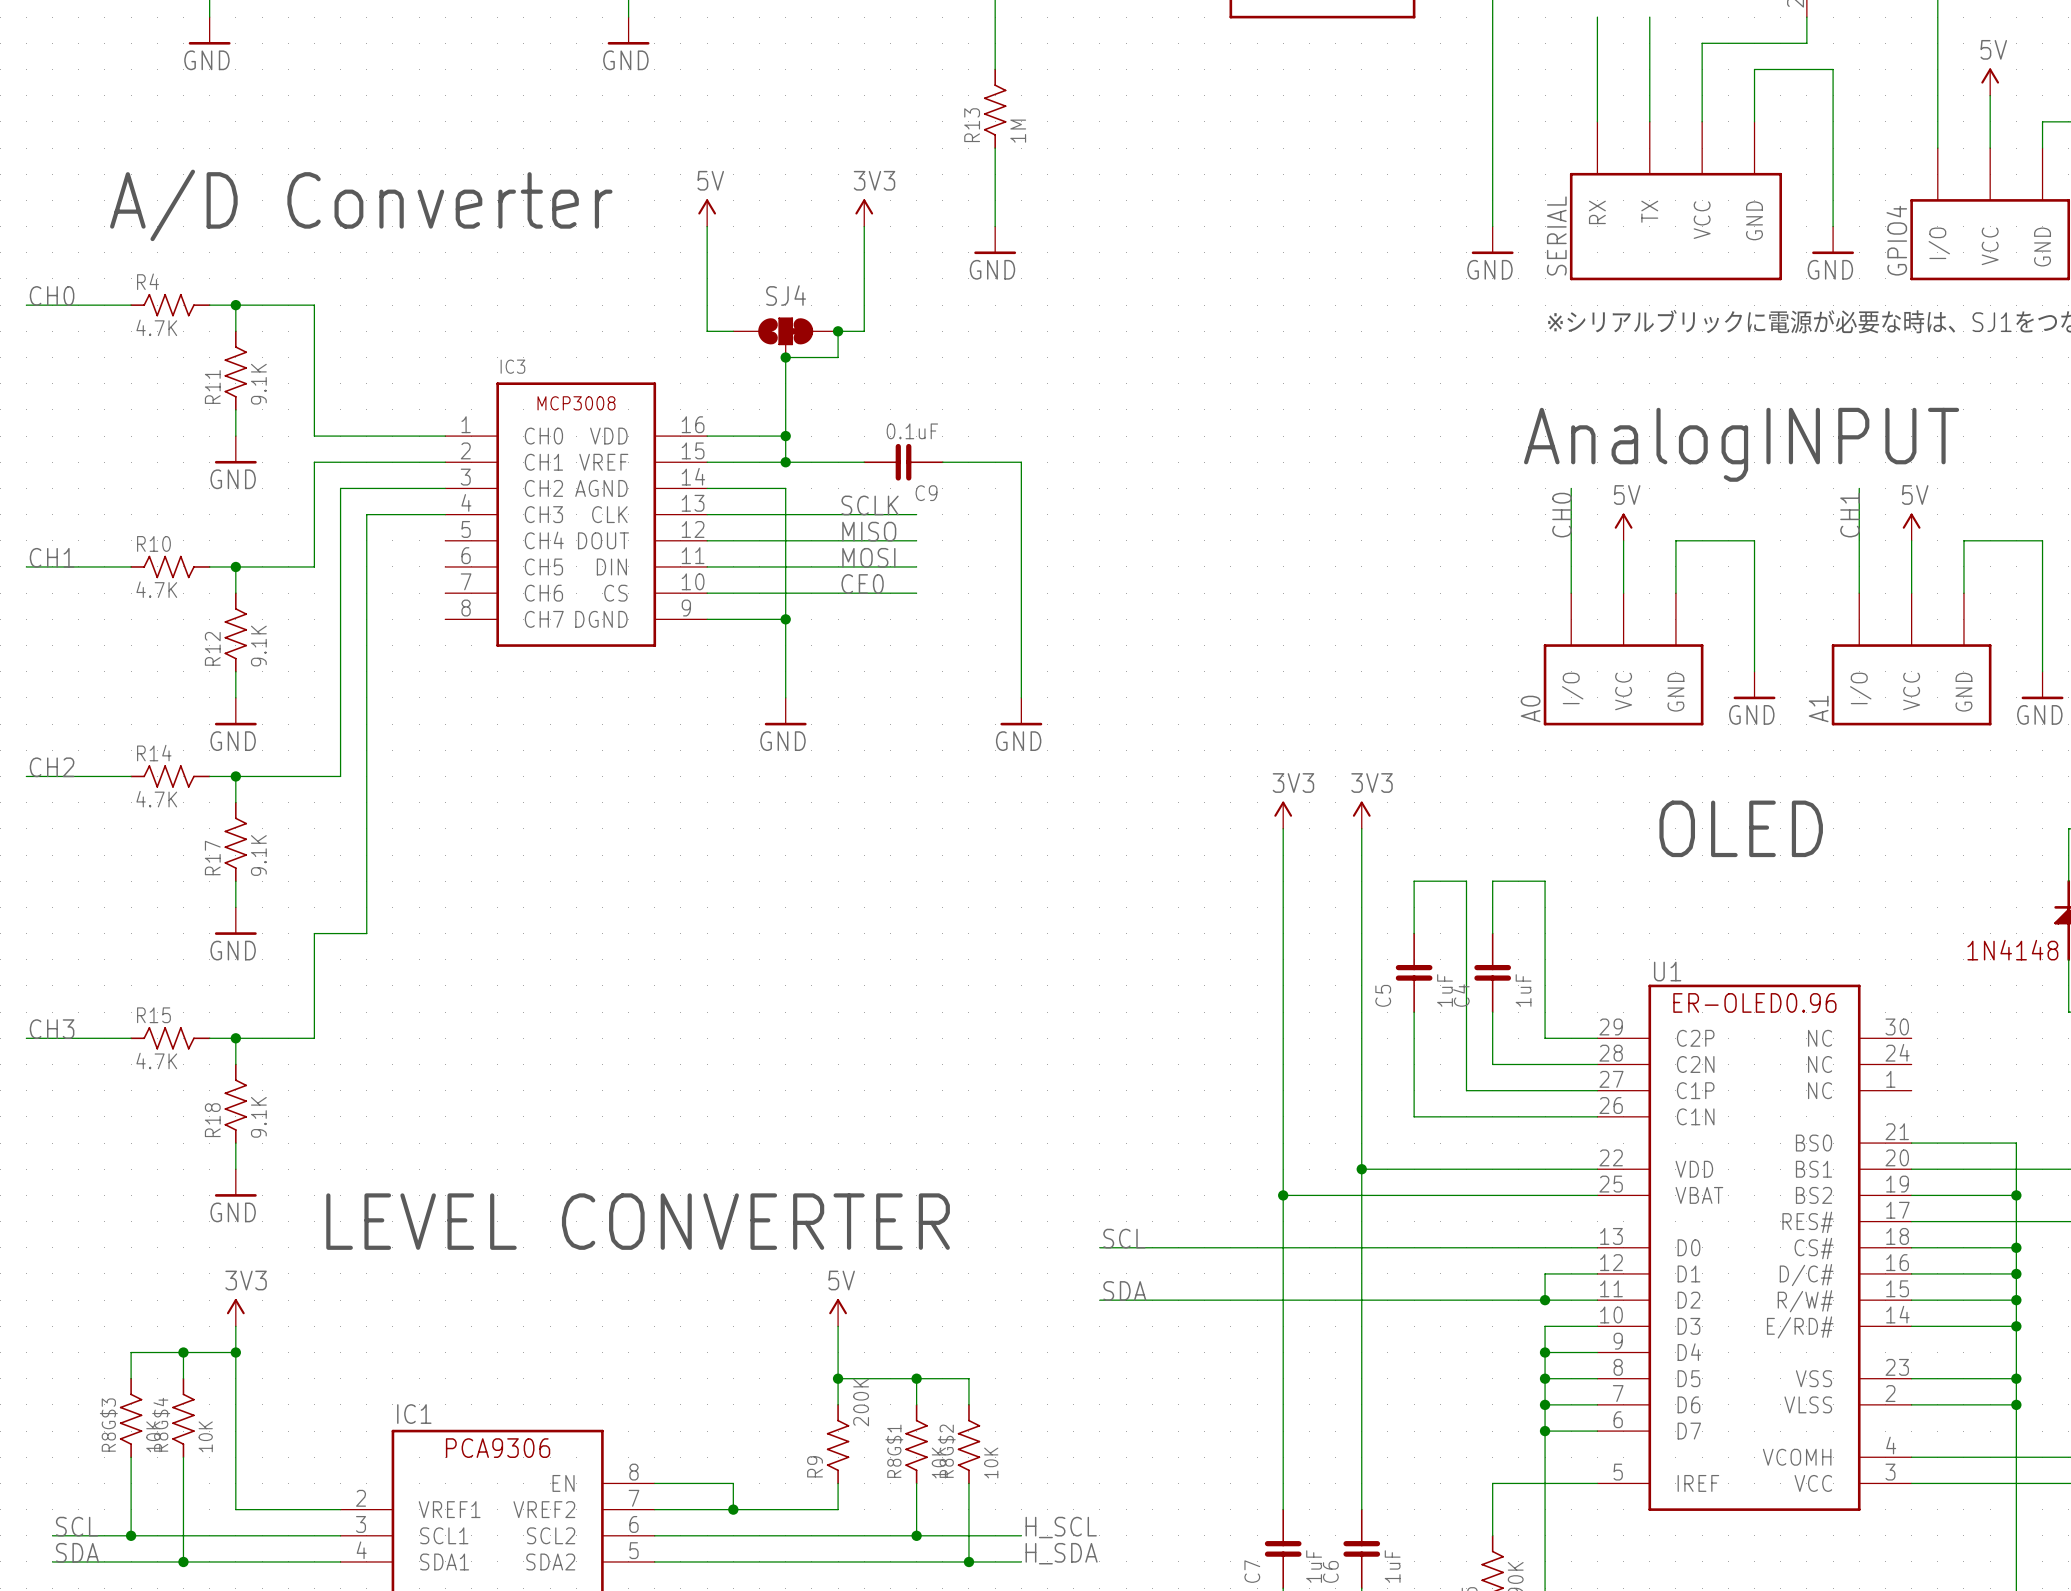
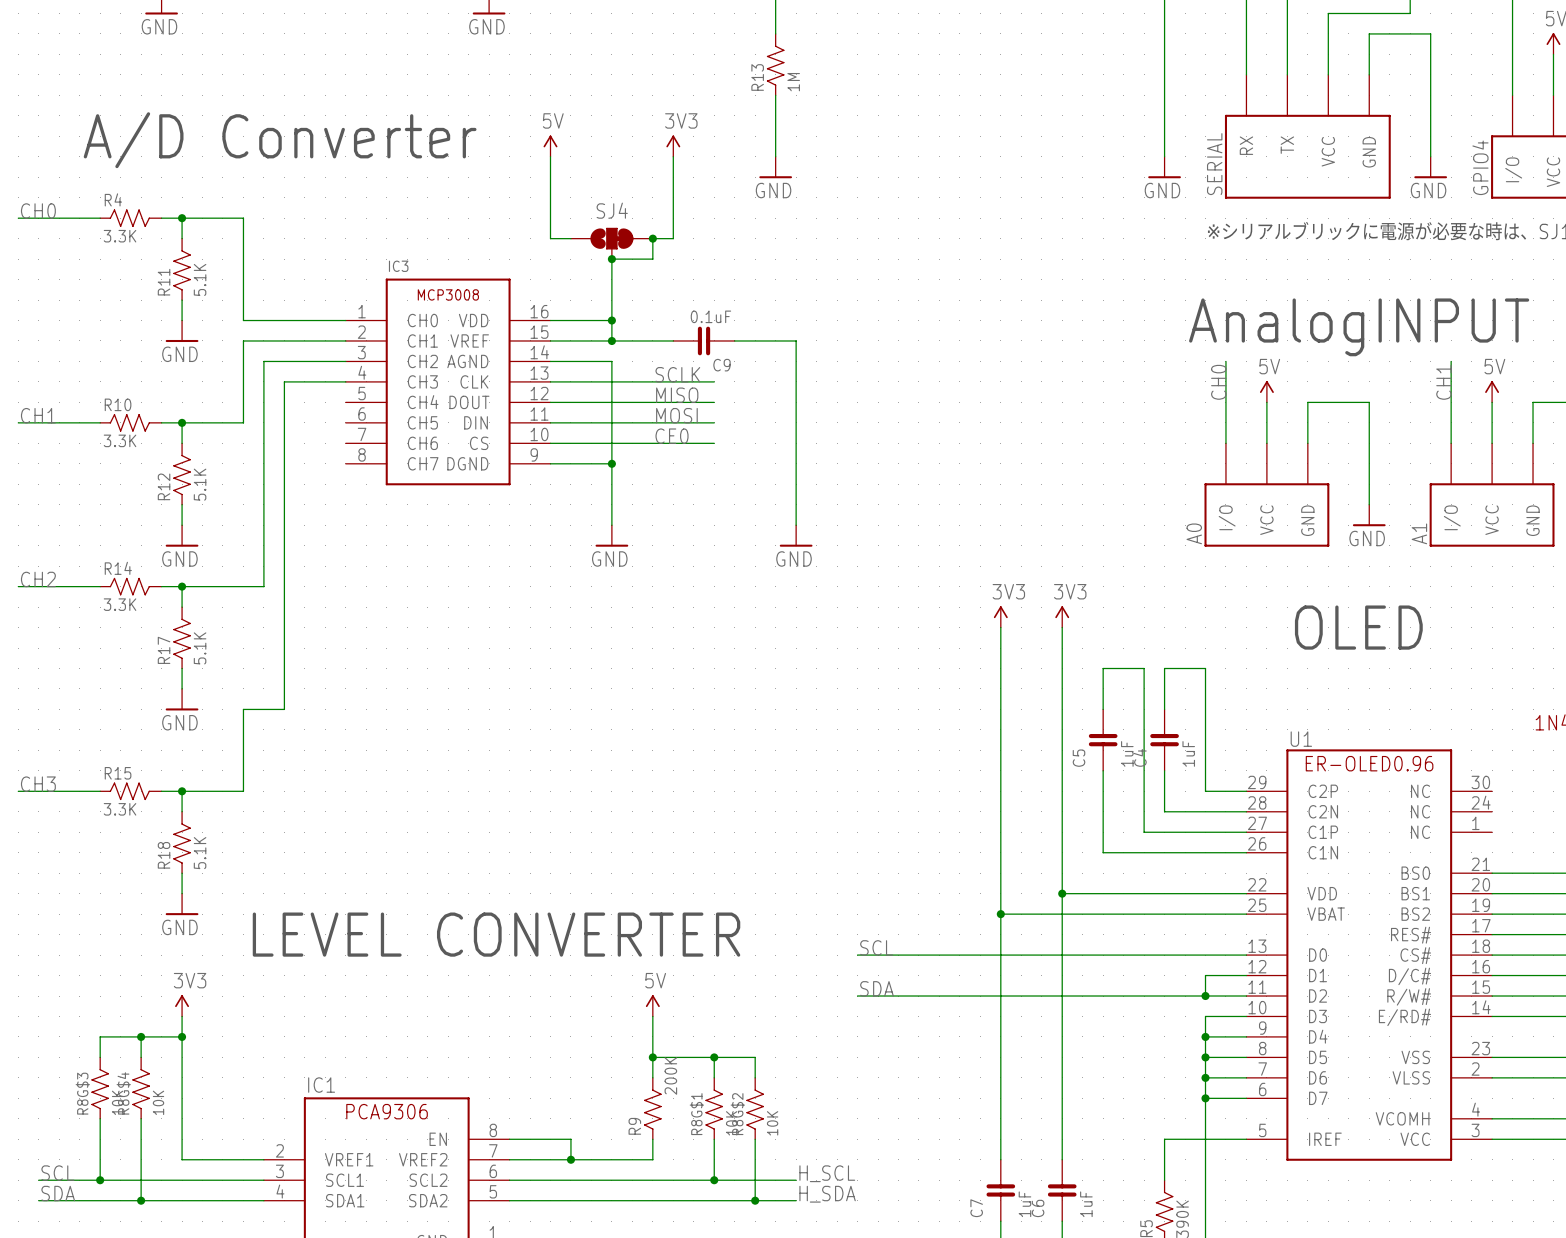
R4 value: 4.7K (156, 327) -> 3.3K (120, 236)
R11 value: 9.1K (258, 384) -> 5.1K (200, 279)
R10 value: 4.7K (156, 589) -> 3.3K (120, 440)
R12 value: 9.1K (258, 646) -> 5.1K (200, 484)
R14 value: 4.7K (156, 799) -> 3.3K (120, 604)
R17 value: 9.1K (258, 855) -> 5.1K (200, 648)
R15 value: 4.7K (156, 1061) -> 3.3K (120, 809)
R18 value: 9.1K (258, 1117) -> 5.1K (200, 853)

